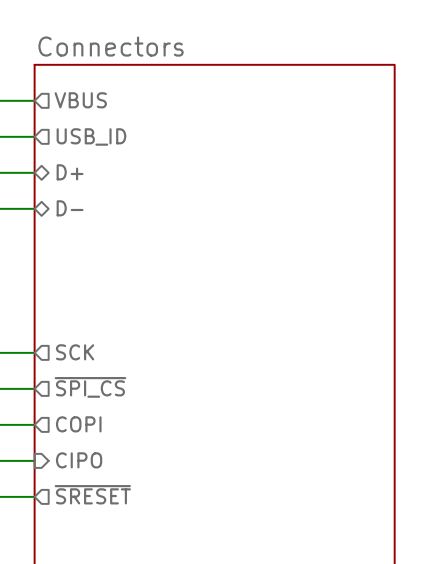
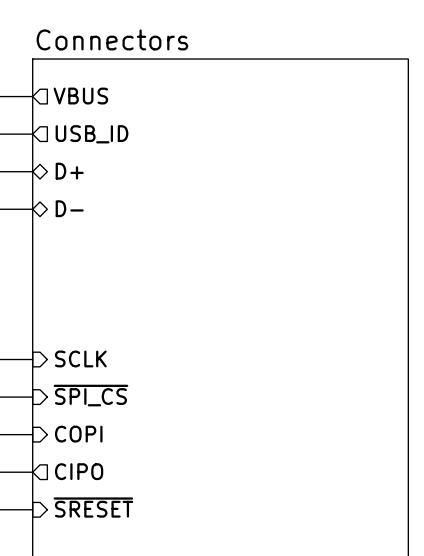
hierarchical label: SCK (75, 352) -> none
sheet pin: none -> SCLK (80, 358)
hierarchical label: ~{SPI_CS} (90, 387) -> none
sheet pin: none -> ~{SPI_CS} (90, 395)
hierarchical label: COPI (78, 424) -> none
sheet pin: none -> COPI (78, 434)
hierarchical label: CIPO (79, 460) -> none
sheet pin: none -> CIPO (79, 471)
hierarchical label: ~{SRESET} (92, 494) -> none
sheet pin: none -> ~{SRESET} (93, 507)

